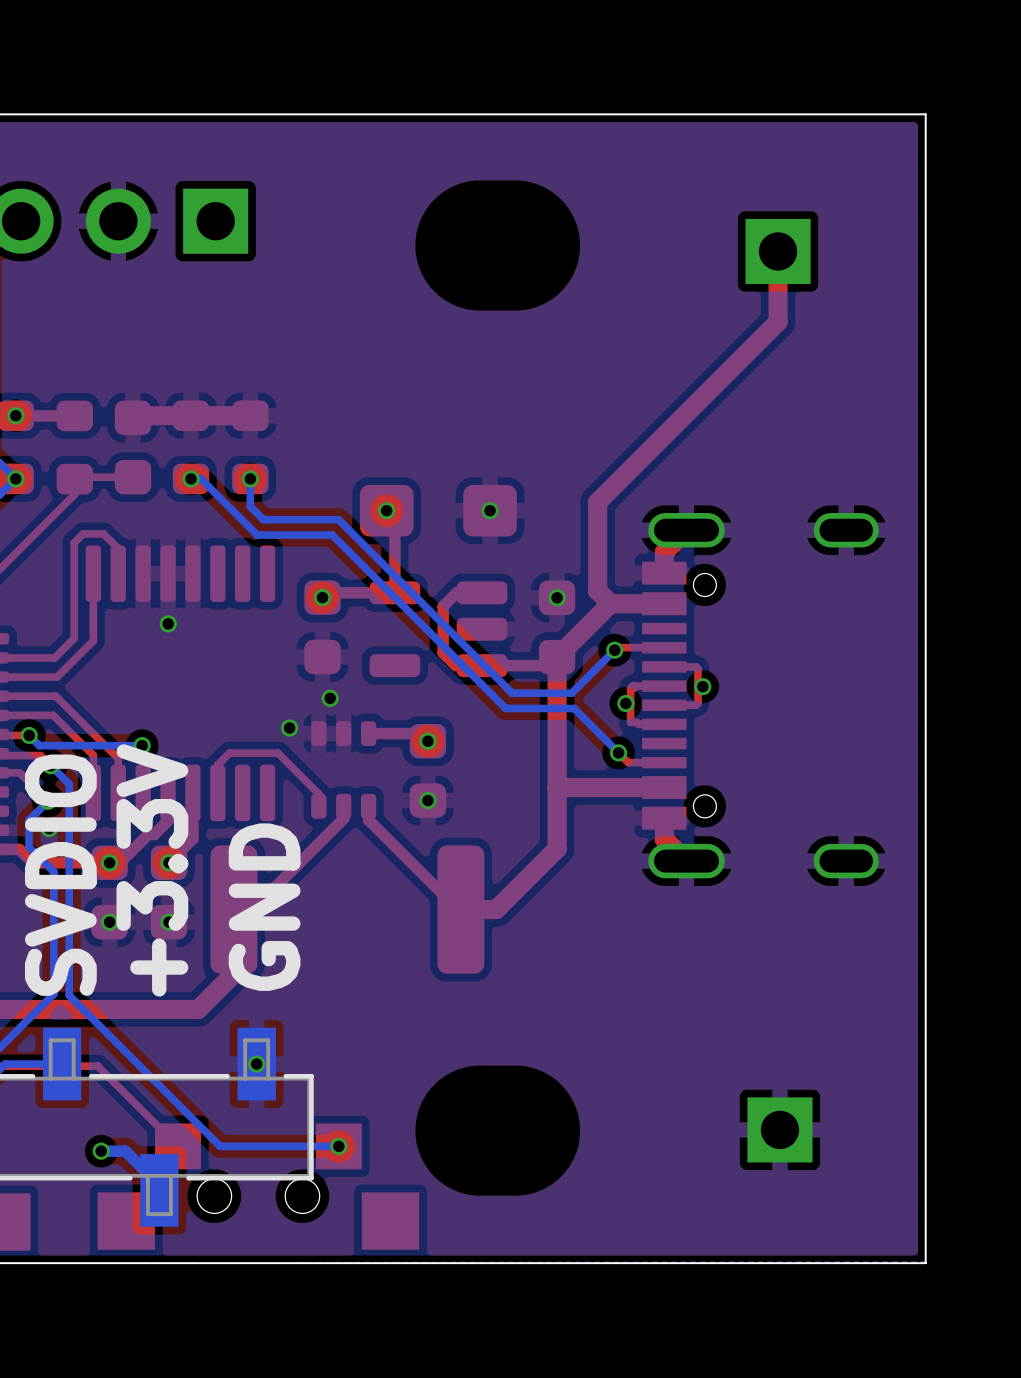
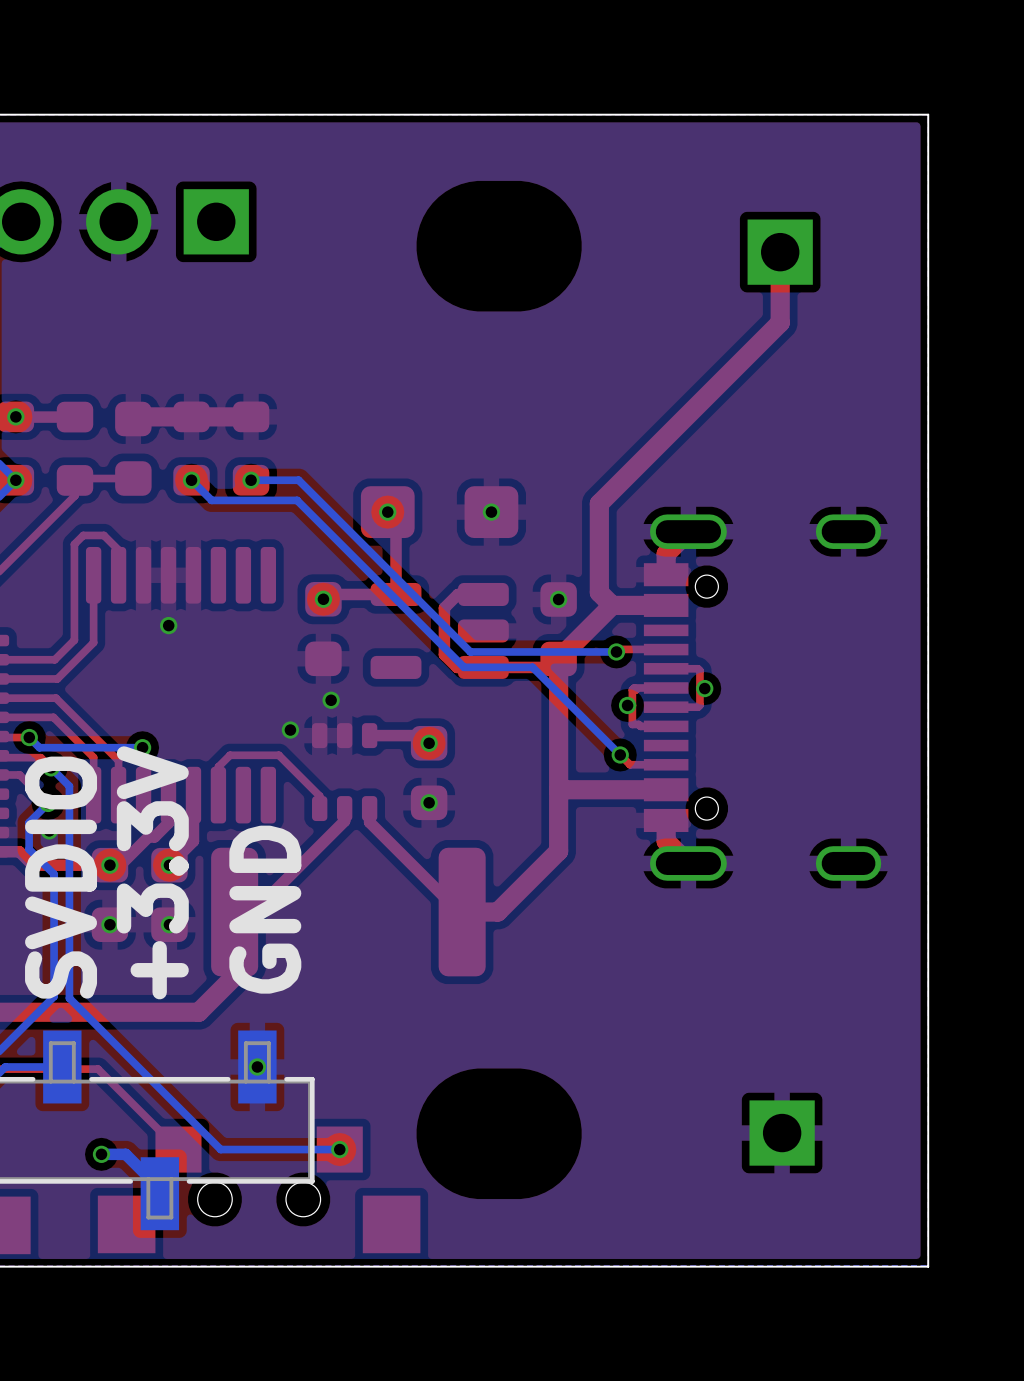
bottom track: (191, 478) (200, 478) (257, 535) (332, 535) -> (191, 480) (211, 500) (297, 500) (333, 536)
bottom track: (250, 478) (250, 506) (263, 519) (338, 519) -> (251, 480) (298, 480) (339, 521)
bottom track: (614, 650) (571, 693) (512, 693) (469, 650) -> (616, 651) (470, 651)
bottom track: (462, 665) (505, 708) (574, 708) -> (464, 667) (532, 667) (575, 710)

